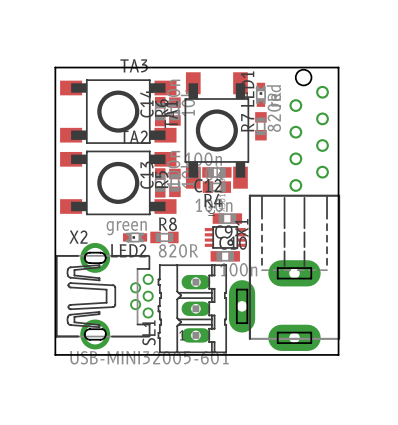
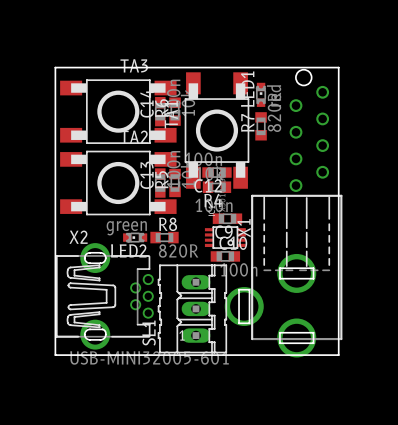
X1 footprint: [228, 194, 341, 351] -> [224, 194, 343, 358]

